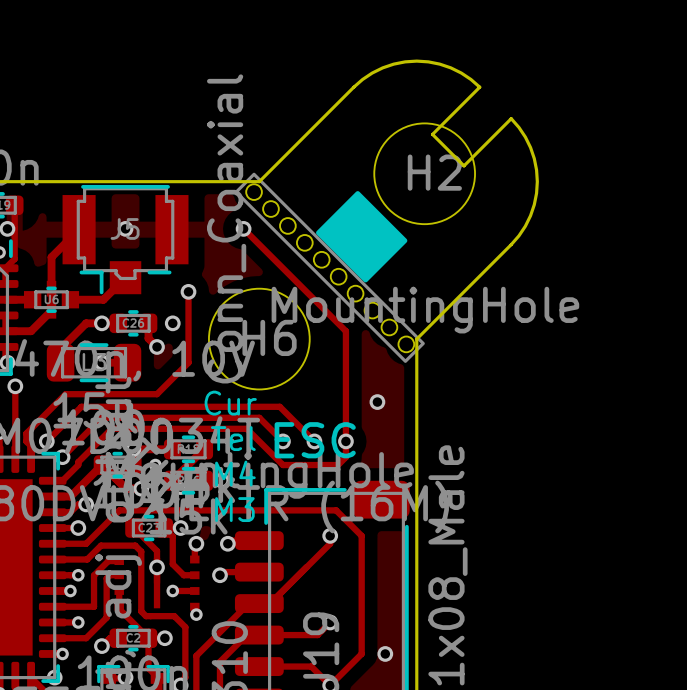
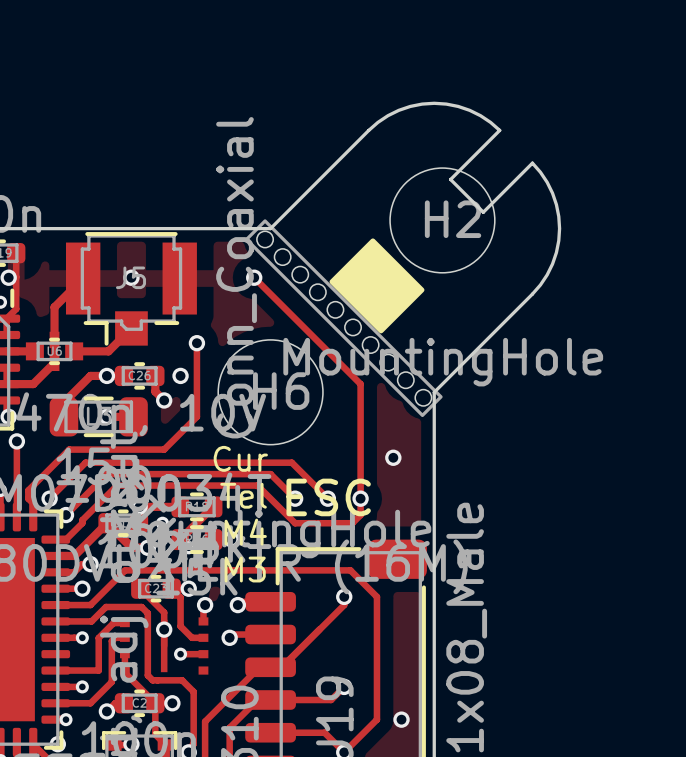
via: (70, 590) -> none
via: (196, 614) -> none

